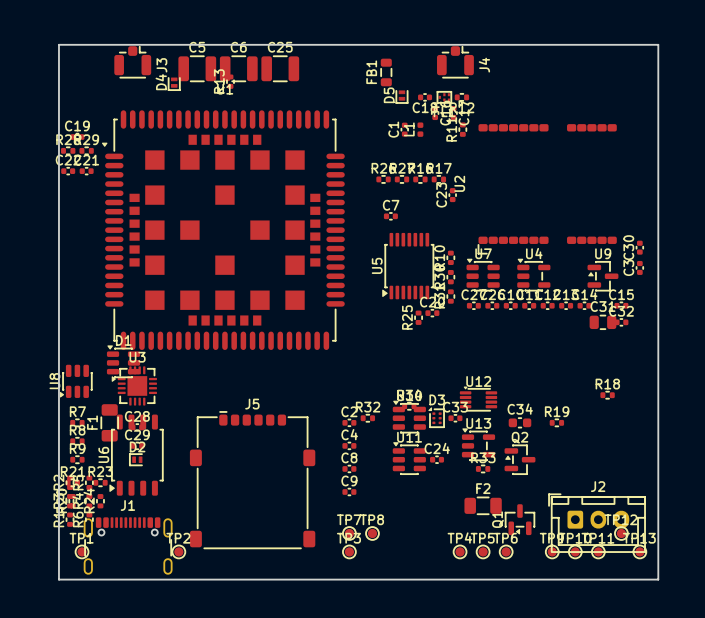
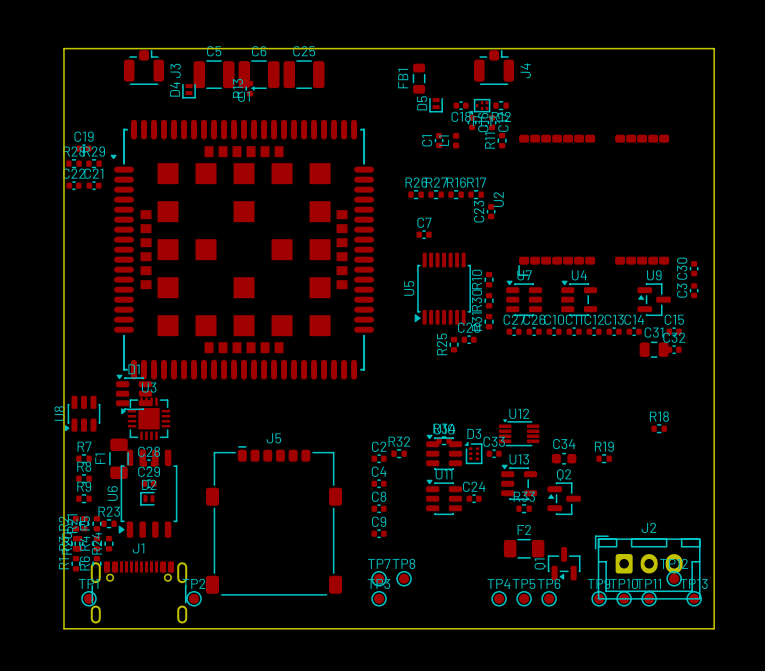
R21 rotation: 0° (72, 482) -> 90° clockwise (84, 523)

